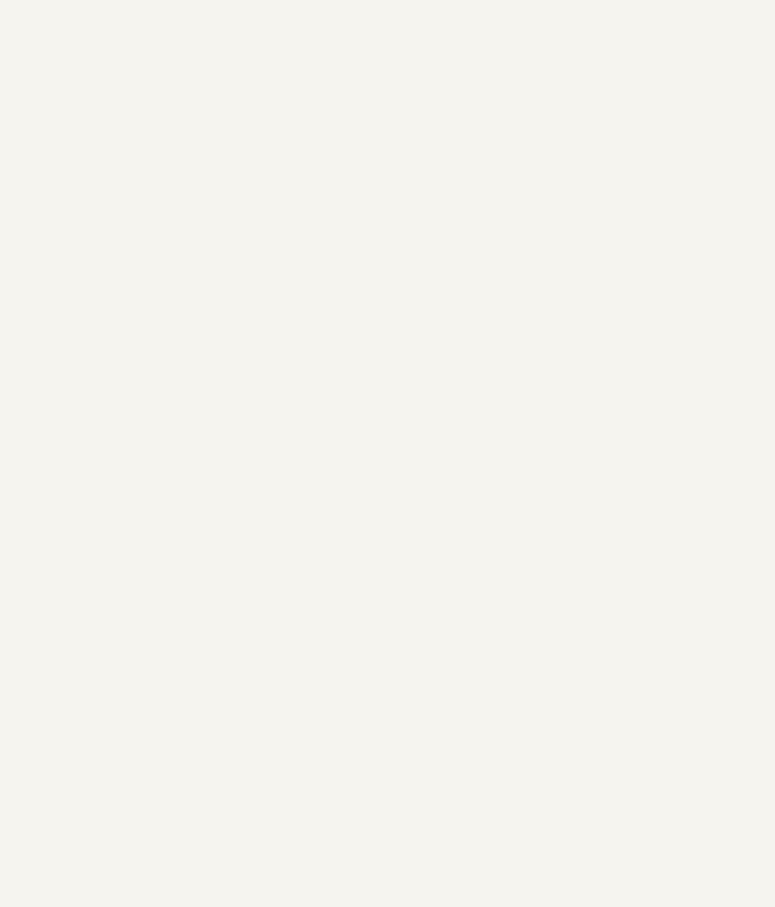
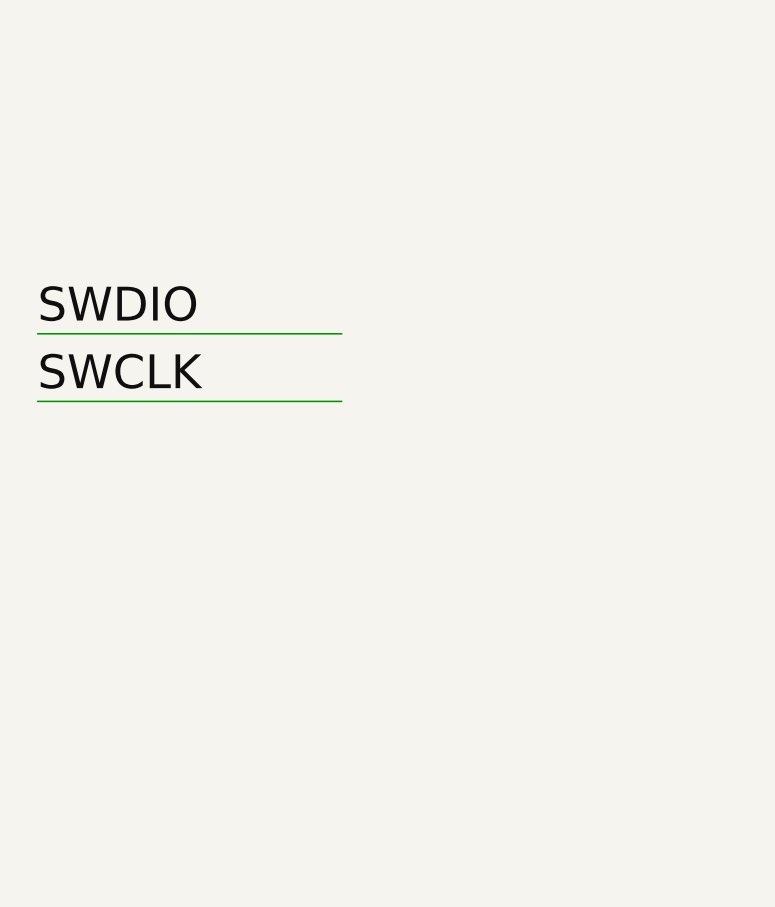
label: none -> SWDIO (118, 303)
wire: none -> (37, 333) (341, 333)
label: none -> SWCLK (121, 371)
wire: none -> (37, 401) (341, 401)

